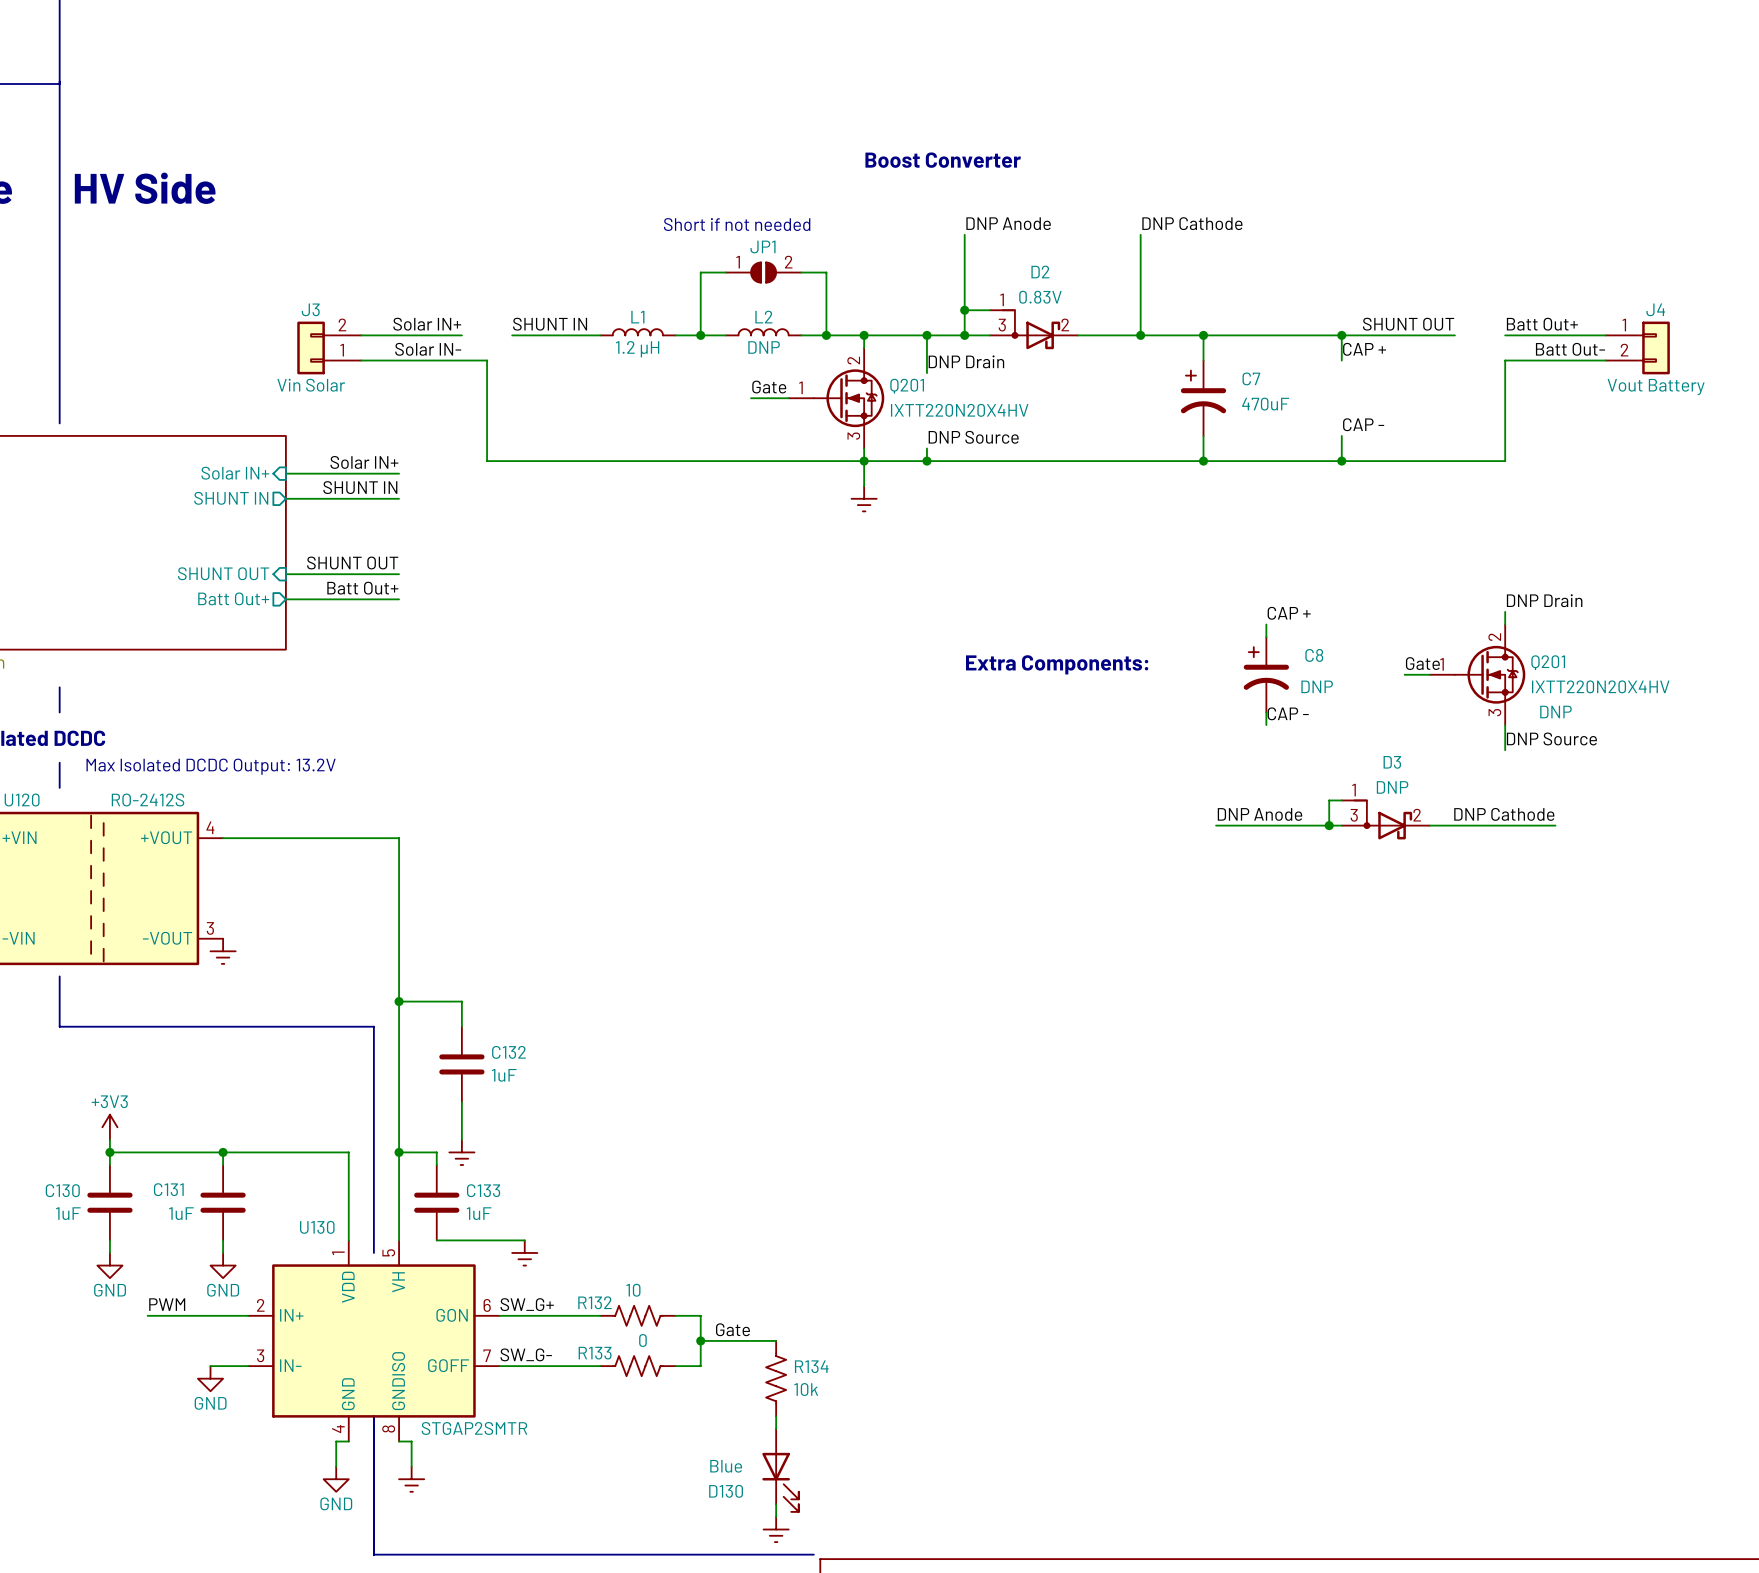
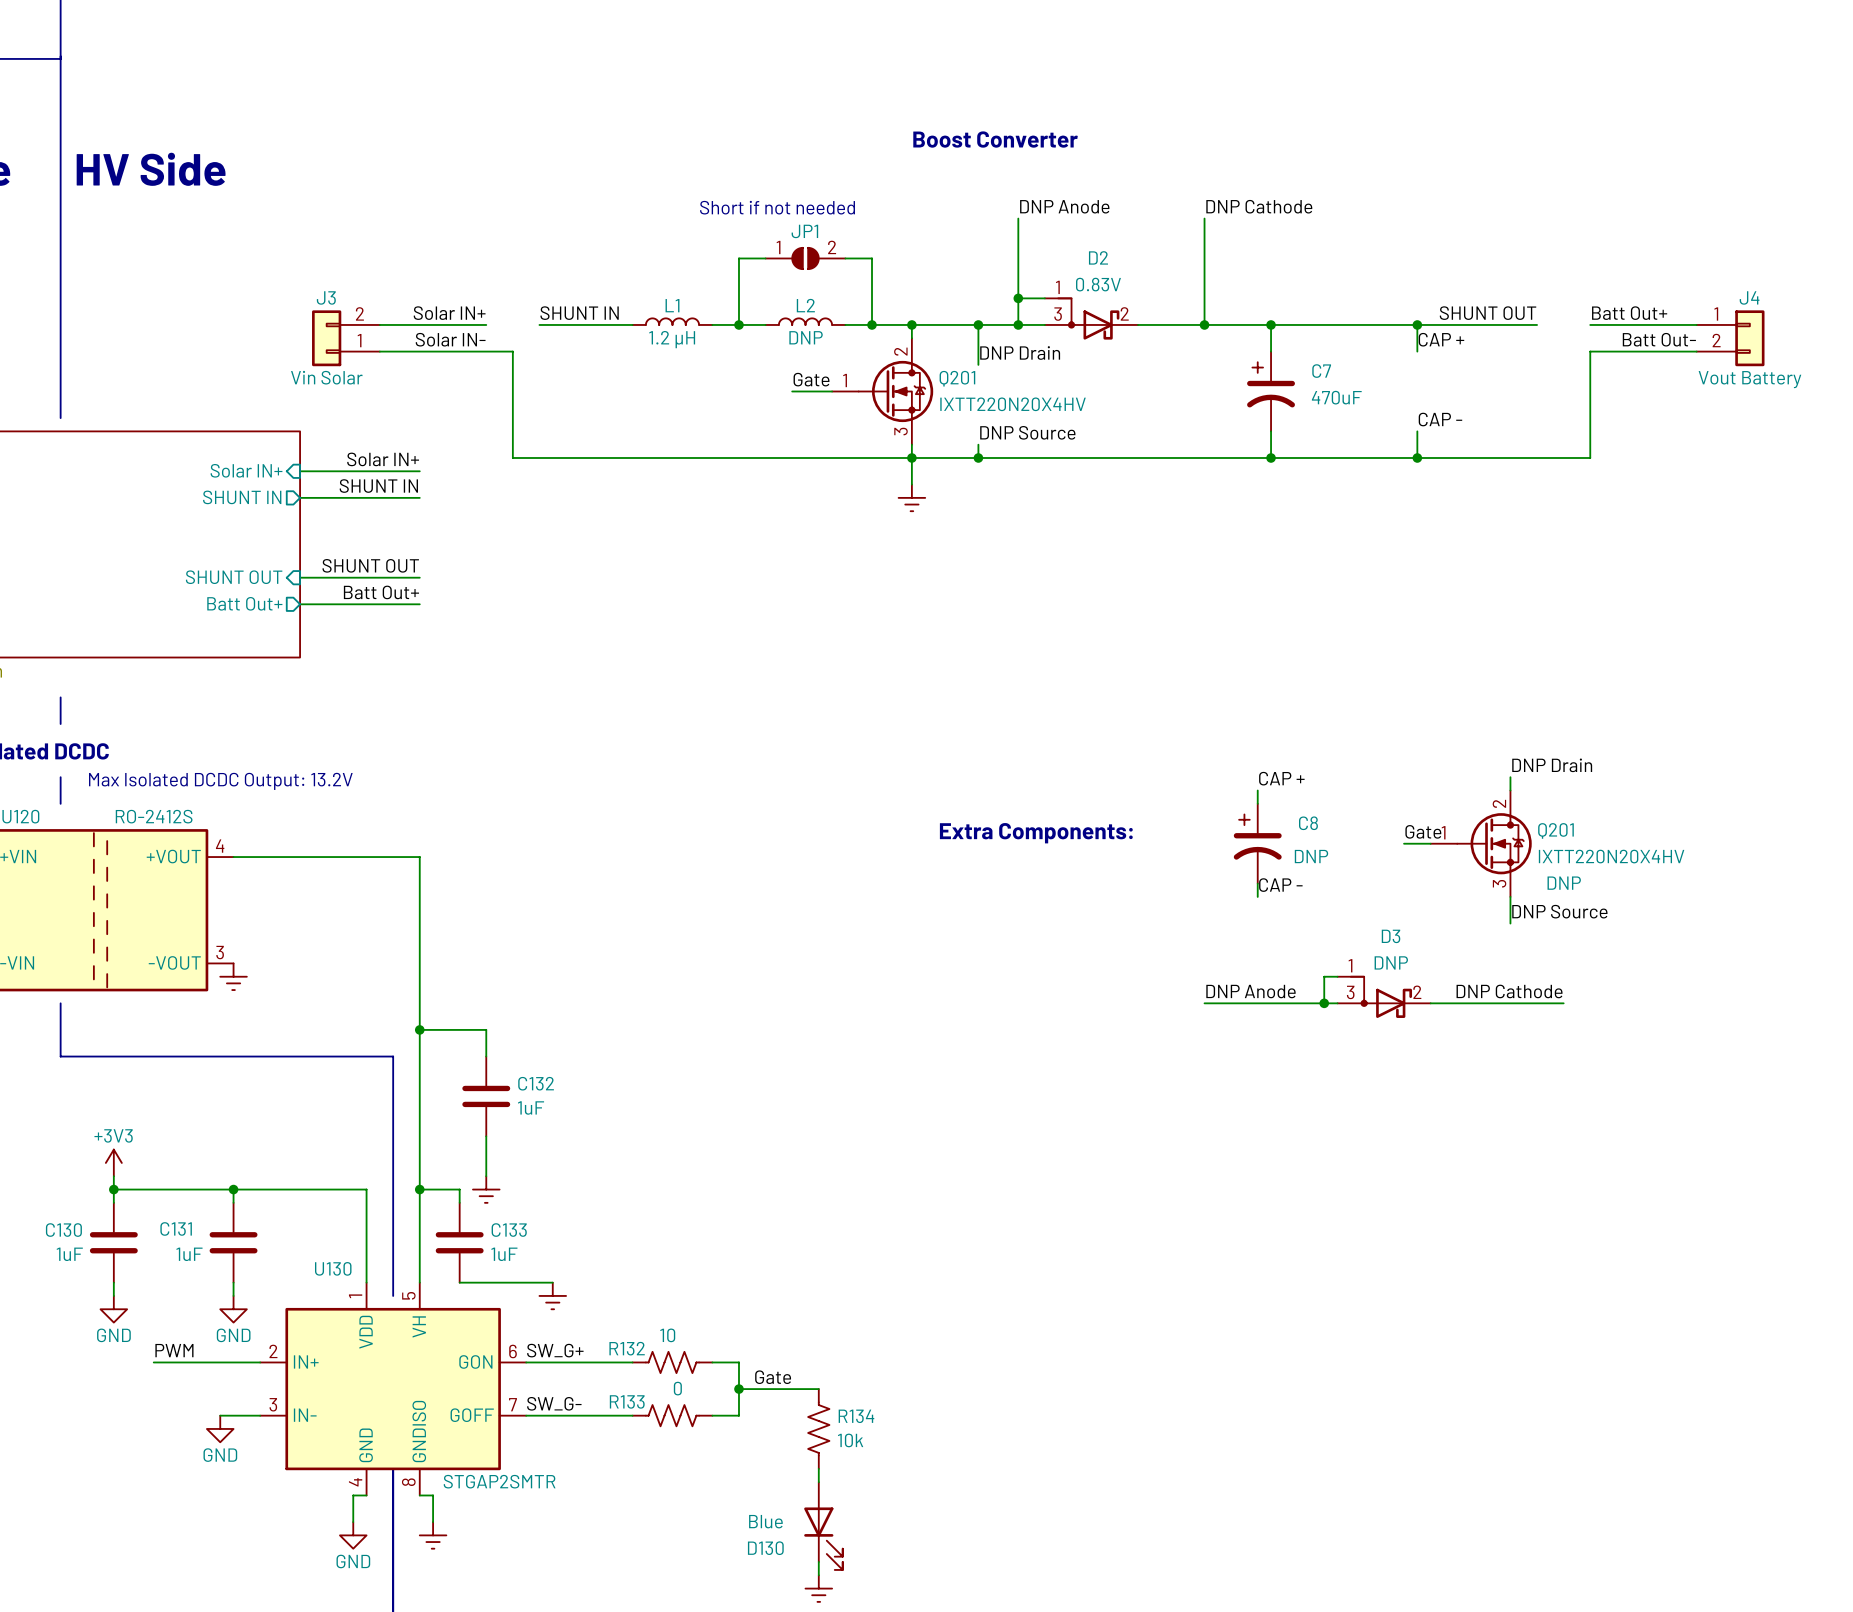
label position: DNP Drain (1544, 600) -> DNP Drain (1552, 765)
wire: (1505, 611) (1505, 624) -> (1510, 777) (1510, 790)
label position: CAP + (1289, 613) -> CAP + (1281, 778)
wire: (1266, 624) (1266, 637) -> (1257, 790) (1257, 803)
label position: Gate (1422, 663) -> Gate (1423, 831)
text position: Extra Components: (1057, 664) -> Extra Components: (1036, 833)
C8 position: (1266, 674) -> (1257, 843)
wire: (1404, 674) (1429, 674) -> none
Q201 position: (1477, 674) -> (1481, 843)
wire: (1266, 712) (1266, 725) -> (1257, 883) (1257, 896)
label position: CAP - (1288, 713) -> CAP - (1280, 885)
wire: (1505, 725) (1505, 750) -> (1510, 896) (1510, 923)
label position: DNP Source (1551, 738) -> DNP Source (1559, 911)
wire: (1341, 800) (1329, 800) (1329, 825) (1216, 825) -> none
label position: DNP Anode (1259, 814) -> DNP Anode (1250, 991)
label position: DNP Cathode (1504, 814) -> DNP Cathode (1509, 991)
D3 position: (1385, 819) -> (1384, 997)
junction: (1329, 825) -> none
wire: (1429, 825) (1555, 825) -> (1430, 1003) (1563, 1003)
wire: none -> (1337, 976) (1324, 976) (1324, 1003)
wire: none -> (1204, 1003) (1337, 1003)
junction: none -> (1324, 1003)

